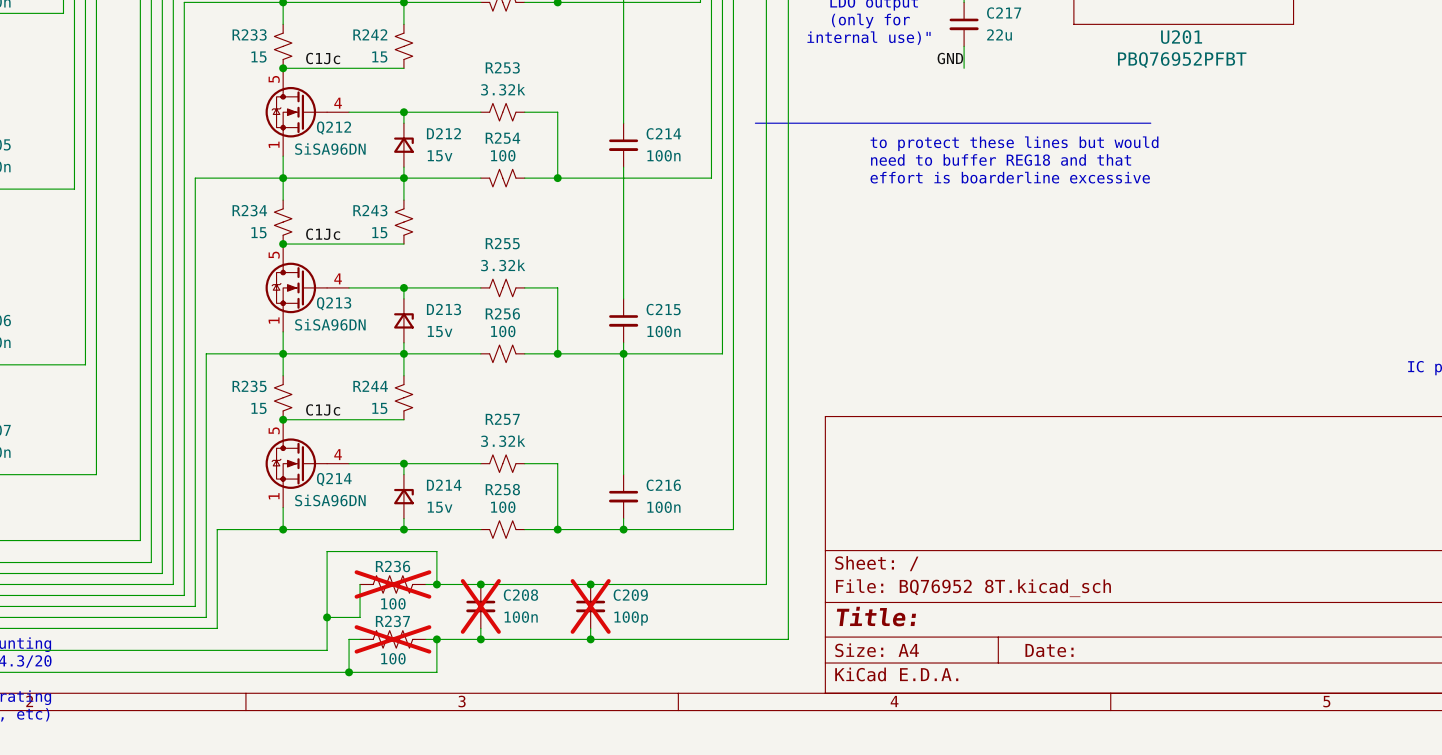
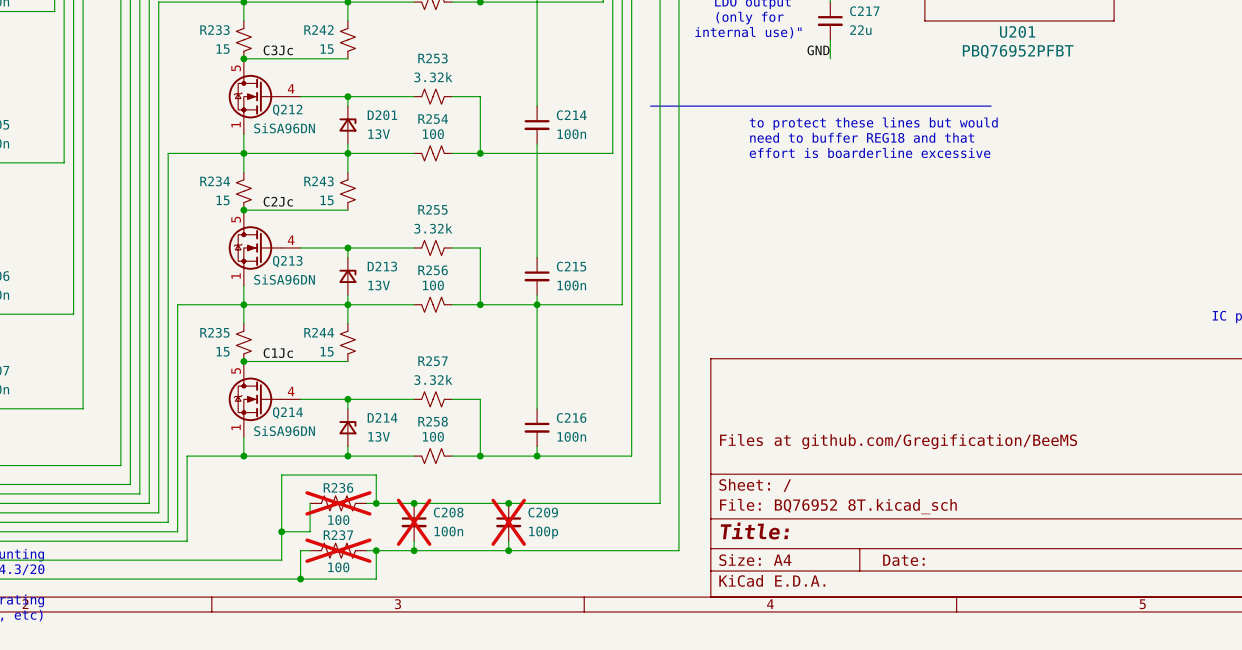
label: C1Jc (323, 58) -> C3Jc (278, 50)
D212 name: D212 (443, 133) -> D201 (382, 115)
D212 value: 15v (440, 155) -> 13V (379, 134)
label: C1Jc (323, 234) -> C2Jc (278, 201)
D213 value: 15v (440, 331) -> 13V (379, 285)
D214 value: 15v (440, 507) -> 13V (379, 436)
title block: none -> Files at github.com/Gregification/BeeMS (898, 441)

